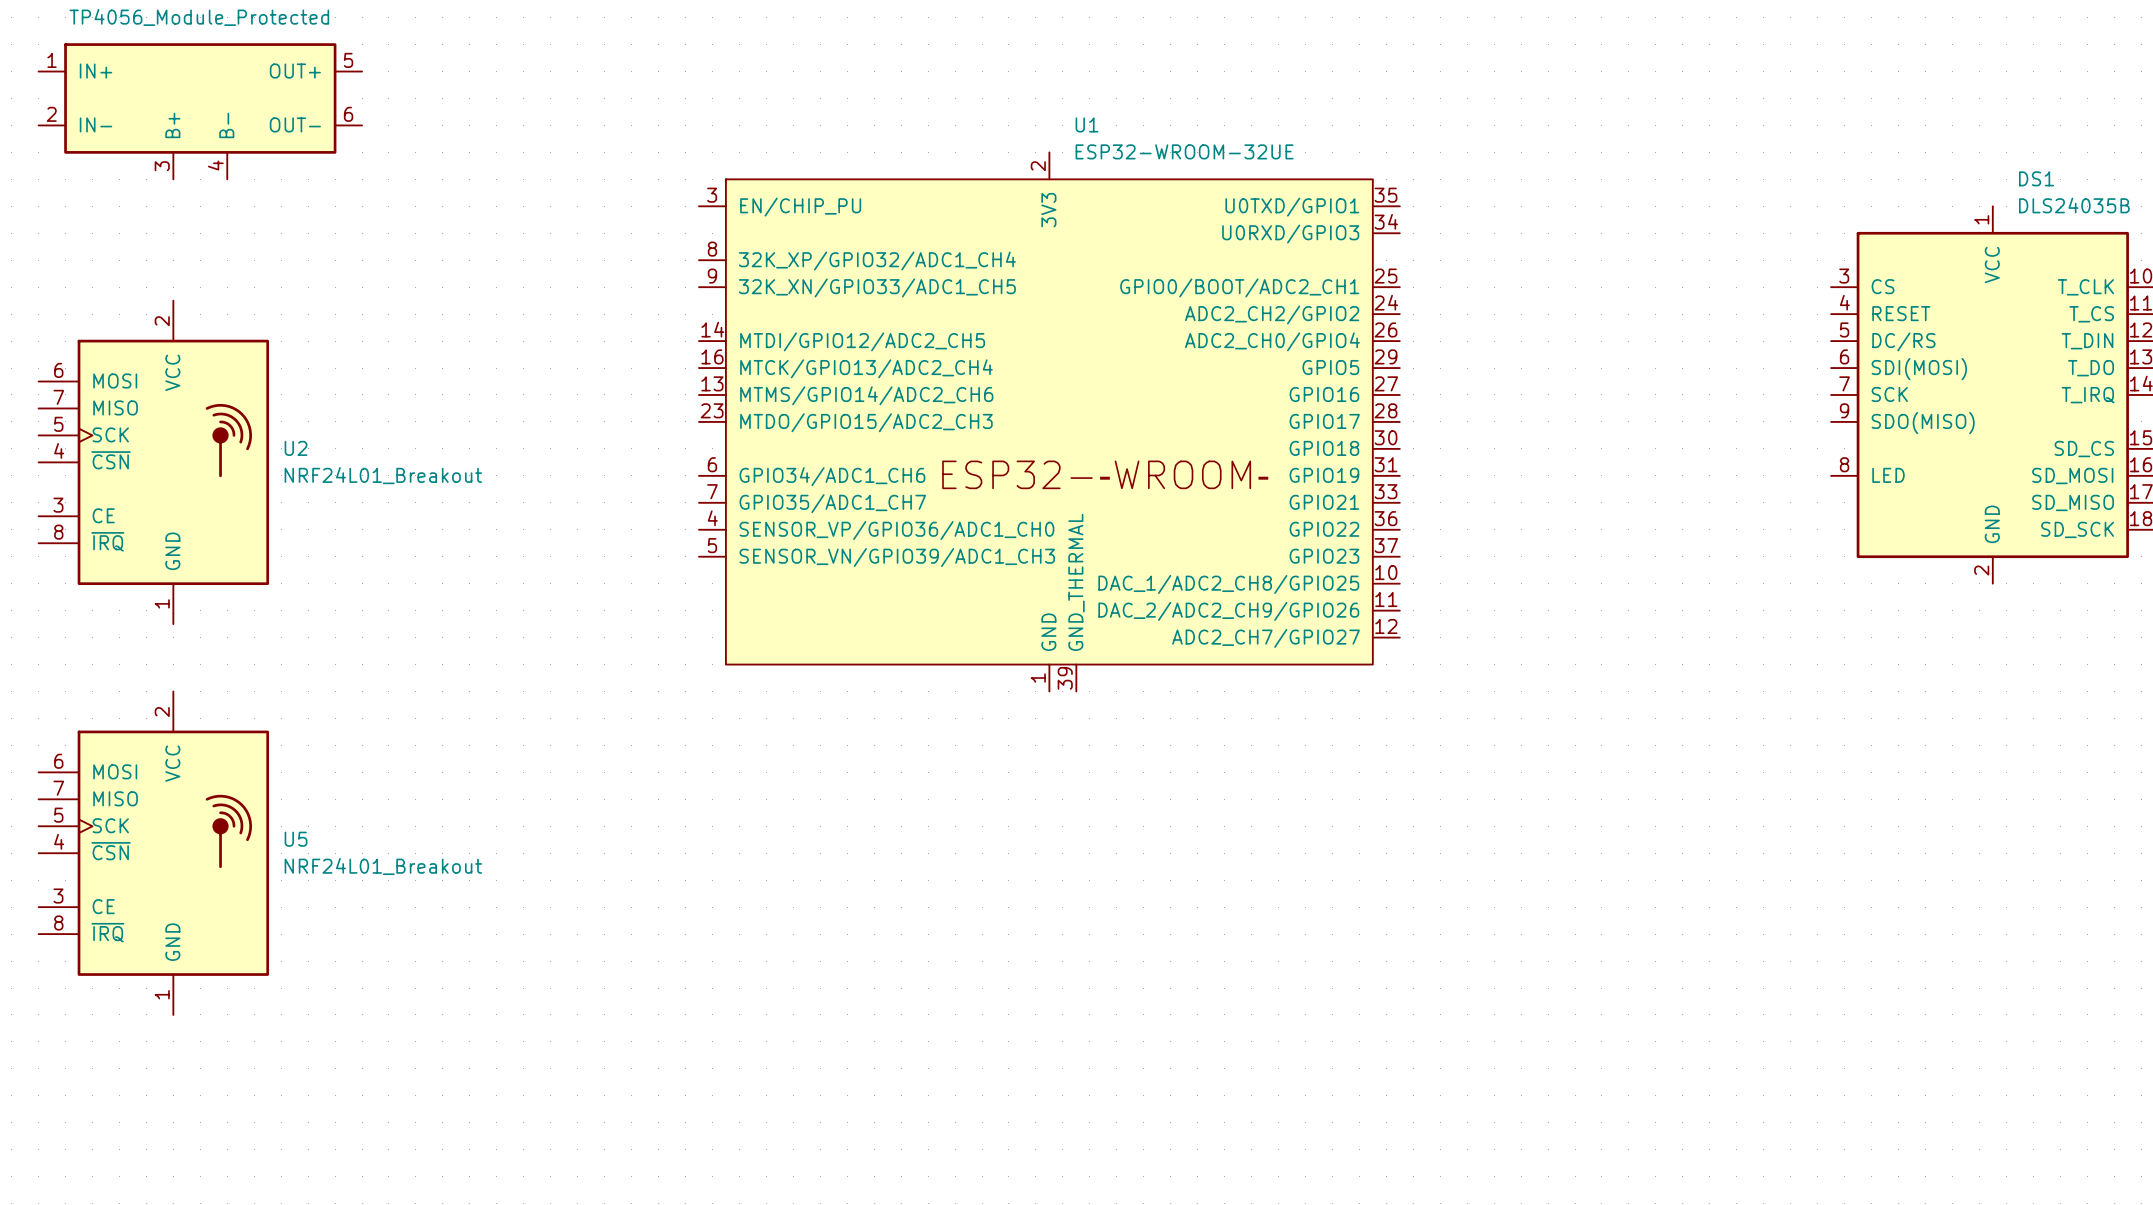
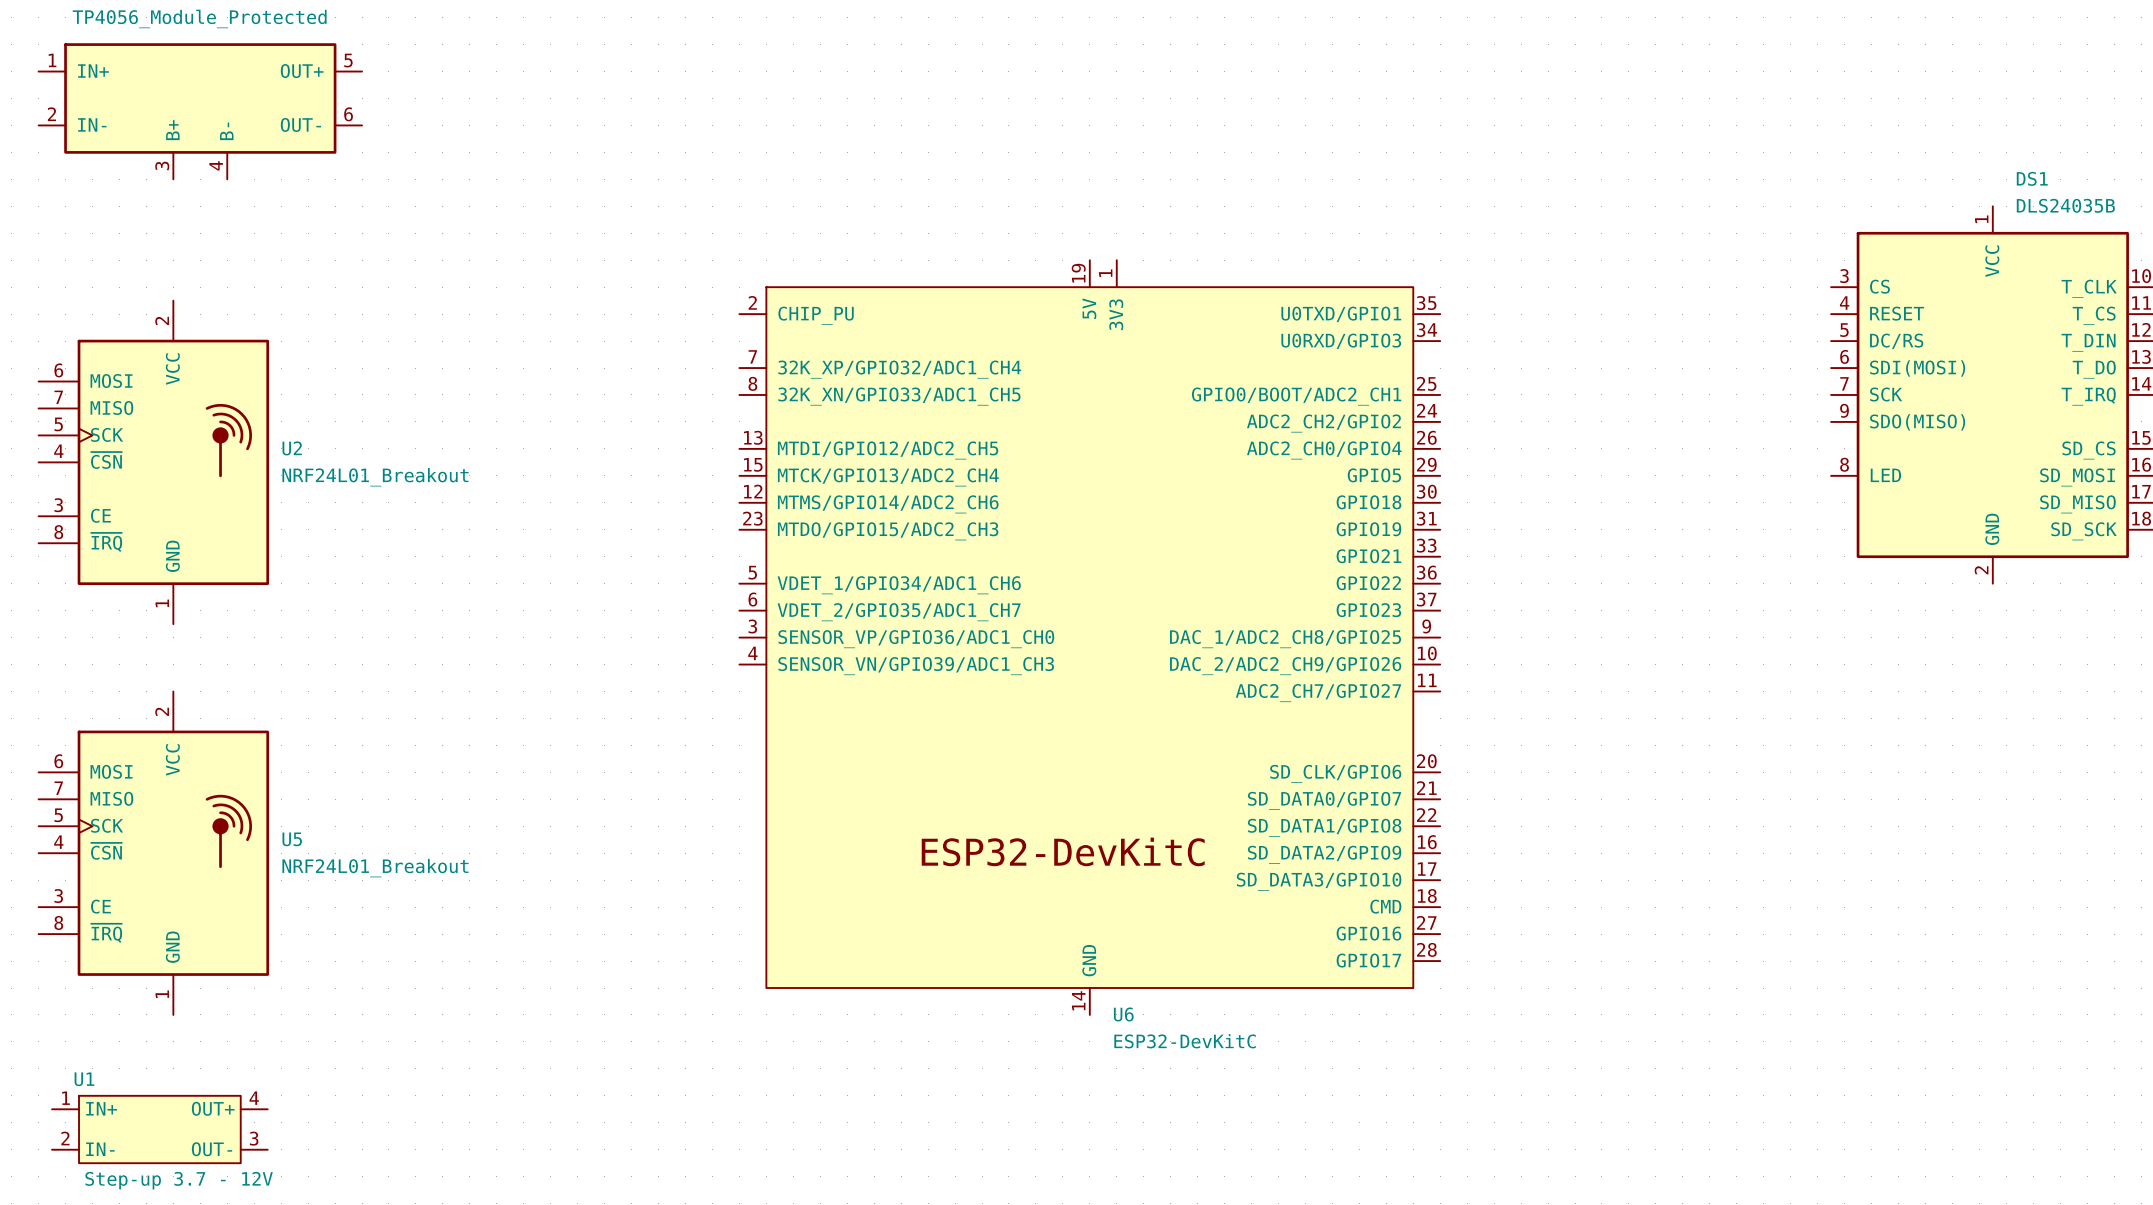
U1 name position: U1 (1086, 124) -> U1 (84, 1079)
U1 value: ESP32-WROOM-32UE (1184, 151) -> Step-up 3.7 - 12V (179, 1180)
U1 symbol: [698, 152, 1400, 692] -> [52, 1095, 268, 1164]
U6: none -> ESP32-DevKitC (1089, 637)

